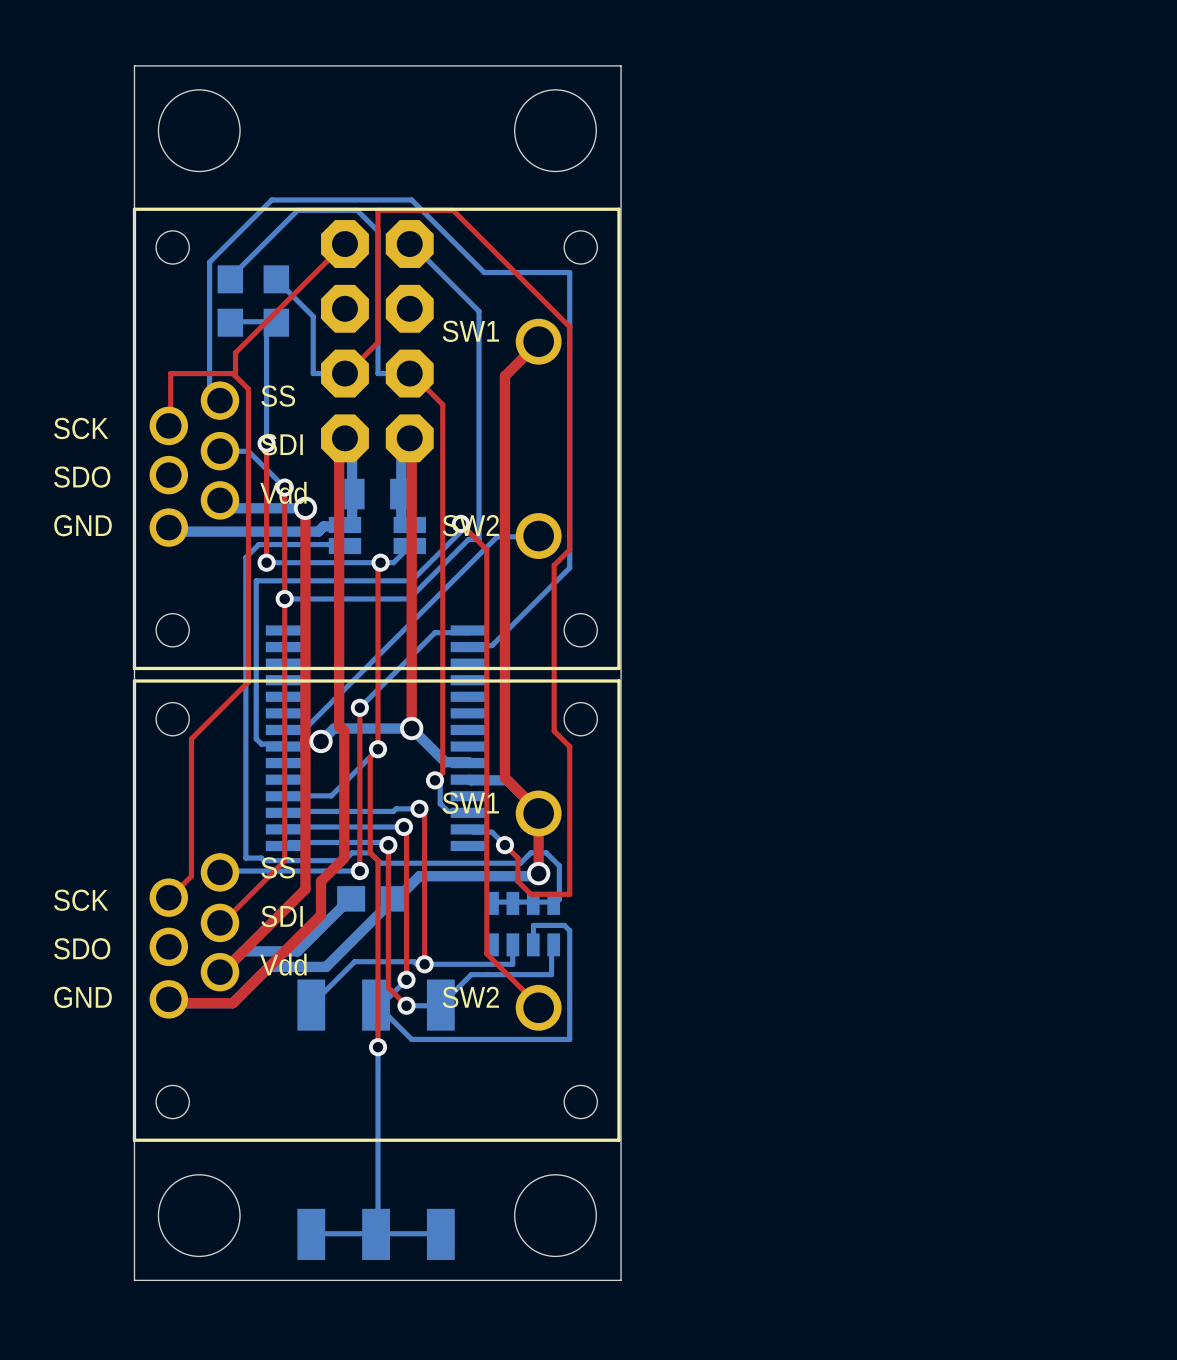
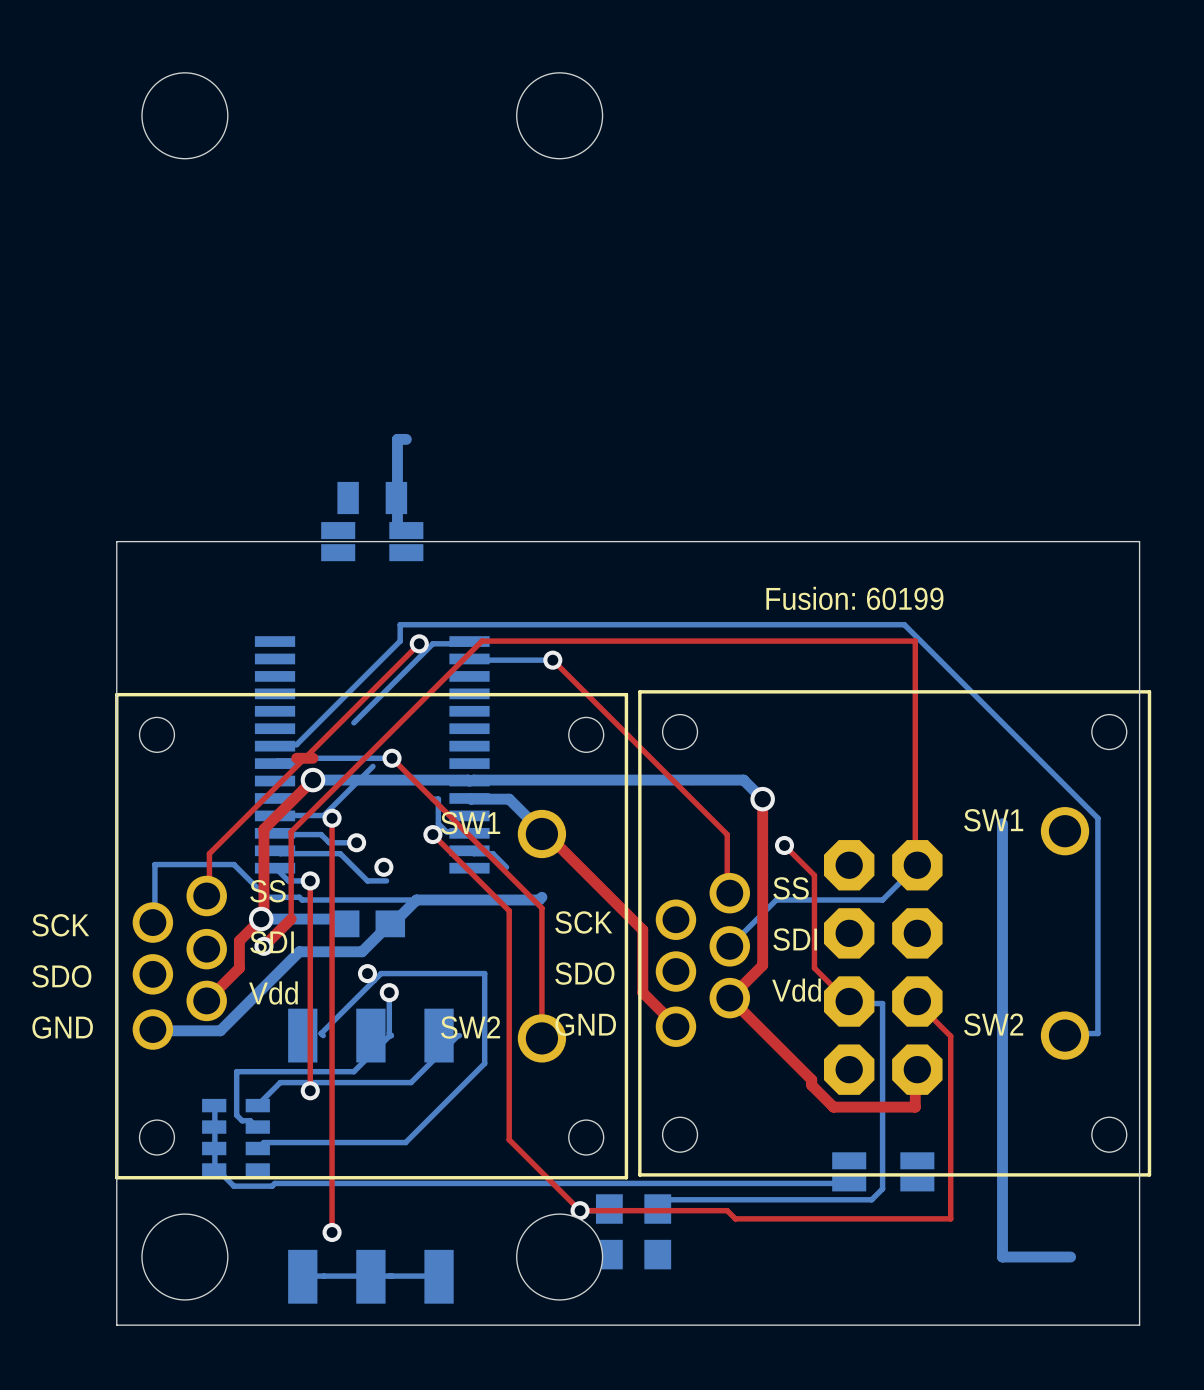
top track: (344, 244) (235, 352) (234, 374) -> none
bottom track: (409, 244) (479, 311) (479, 539) (468, 539) (409, 598) (284, 598) -> none
bottom track: (230, 279) (297, 210) (357, 210) (378, 231) (378, 373) (409, 373) -> none
bottom track: (276, 279) (313, 316) (313, 373) (344, 373) -> none
part: (230, 301) -> none
part: (276, 301) -> none
bottom track: (230, 322) (230, 321) (274, 321) (276, 322) (266, 321) (266, 443) -> none
part: (377, 341) -> none
top track: (538, 341) (504, 376) (504, 777) (538, 811) (538, 873) -> none
top track: (344, 373) (378, 342) (378, 210) (453, 210) (569, 326) (569, 549) (554, 565) (554, 731) (569, 746) (569, 894) (530, 894) (517, 881) (517, 858) (504, 845) -> none
top track: (409, 373) (442, 404) (442, 772) (435, 780) -> none
bottom track: (219, 400) (209, 399) (209, 262) (271, 199) (411, 199) (484, 272) (569, 272) (569, 567) (492, 645) (469, 647) -> (552, 660) (469, 658)
top track: (168, 425) (170, 425) (170, 373) (232, 373) (248, 389) (248, 681) (191, 738) (191, 876) (168, 897) -> none
bottom track: (344, 438) (352, 438) (352, 490) (354, 494) (352, 495) (352, 523) (341, 526) (323, 526) (318, 531) (173, 531) (168, 527) -> none
top track: (344, 438) (339, 443) (339, 725) (344, 731) (344, 858) (321, 881) (321, 915) (232, 1003) (170, 1003) (168, 999) -> none
part: (376, 438) -> none
top track: (409, 438) (411, 438) (411, 728) -> none
top track: (266, 443) (266, 562) -> none
via: (266, 443) -> none
bottom track: (219, 451) (248, 451) (284, 487) -> none
top track: (284, 487) (284, 860) (222, 922) (219, 922) -> none
via: (284, 487) -> none
bottom track: (219, 500) (230, 508) (305, 508) -> none
top track: (305, 508) (305, 889) (300, 894) -> (917, 865) (915, 864) (915, 641) (481, 641) (291, 831) (291, 919)
via: (305, 508) -> none
bottom track: (460, 523) (460, 531) (411, 580) (256, 580) (256, 738) (261, 744) (284, 744) (284, 746) -> (392, 758) (304, 758) (302, 761) (277, 761) (275, 763)
top track: (460, 523) (486, 549) (486, 953) (538, 1007) -> none
via: (460, 523) -> none
board edge: (134, 535) (134, 65) (621, 65) (621, 1280) -> (116, 541) (1139, 541) (1139, 1325) (628, 1325)
bottom track: (538, 536) (497, 536) (403, 630) -> (1065, 1035) (1065, 1033) (1097, 1033) (1097, 818) (904, 624) (400, 624) (400, 641)
bottom track: (344, 546) (258, 544) (245, 557) (245, 858) (261, 858) -> (152, 919) (154, 919) (154, 864) (233, 864) (250, 880)
bottom track: (409, 546) (393, 562) (266, 562) -> none
via: (266, 562) -> none
top track: (380, 562) (378, 565) (378, 749) (370, 757) (370, 852) (378, 860) (378, 1047) -> none
via: (380, 562) -> none
text: none -> Fusion: 60199 (854, 598)
via: (284, 598) -> none
top track: none -> (419, 643) (209, 853) (209, 891) (206, 893)
via: none -> (419, 643)
top track: none -> (552, 660) (727, 834) (727, 891) (729, 893)
via: none -> (552, 660)
top track: (359, 707) (359, 871) -> none
via: (359, 707) -> none
via: (411, 728) -> none
bottom track: (321, 741) (333, 728) (411, 728) (445, 762) -> (312, 780) (443, 780)
via position: (321, 741) -> (312, 780)
top track: none -> (392, 758) (541, 908) (541, 1035)
via position: (378, 749) -> (392, 758)
top track: none -> (312, 780) (263, 829) (263, 916) (239, 940) (239, 968) (209, 998) (206, 998)
bottom track: none -> (469, 781) (743, 780) (762, 799)
via: (435, 780) -> none
top track: none -> (762, 799) (762, 965) (729, 998)
via: none -> (762, 799)
top track: none -> (332, 818) (332, 1232)
via: none -> (332, 818)
bottom track: none -> (1002, 823) (1002, 1257) (1070, 1257)
bottom track: (419, 808) (396, 808) (393, 811) (284, 812) -> (356, 842) (329, 842) (321, 834) (275, 833)
top track: (419, 808) (424, 814) (424, 964) -> none
via position: (419, 808) -> (432, 834)
top track: none -> (541, 831) (642, 929) (642, 992) (675, 1026)
top track: none -> (432, 834) (509, 910) (509, 1139) (580, 1210) (727, 1210) (735, 1218) (950, 1218) (950, 1036) (917, 1001)
via: none -> (356, 842)
top track: none -> (784, 845) (814, 875) (814, 968) (849, 1001)
via: none -> (784, 845)
bottom track: (403, 826) (287, 826) (284, 829) -> (386, 880) (367, 880) (340, 853) (280, 853) (275, 850)
top track: (403, 826) (406, 829) (406, 979) -> none
via: (403, 826) -> none
bottom track: none -> (917, 865) (882, 899) (776, 899) (729, 946)
bottom track: (388, 845) (385, 842) (289, 842) (284, 845) -> (310, 880) (288, 880) (275, 868)
top track: (388, 845) (388, 987) (406, 1005) -> none
via: (504, 845) -> none
top track: none -> (310, 880) (310, 1090)
via: none -> (310, 880)
bottom track: (264, 860) (344, 860) (352, 852) (370, 852) (380, 863) (520, 863) (530, 852) (546, 852) (559, 865) (559, 899) (551, 899) (553, 903) (492, 903) -> (253, 883) (266, 897) (299, 897) (302, 899) (416, 899)
bottom track: (359, 871) (219, 872) -> none
via: (359, 871) -> none
via: (538, 873) -> none
via: none -> (261, 919)
bottom track: (351, 898) (297, 951) (243, 951) (222, 972) (219, 972) -> (344, 923) (340, 919) (261, 919)
part: none -> (894, 933)
top track: (274, 920) (222, 972) (219, 972) -> none
via: none -> (263, 946)
part rotation: 0° (523, 924) -> 90° clockwise (236, 1137)
part position: (523, 924) -> (236, 1137)
bottom track: (367, 925) (326, 966) (269, 966) (232, 1003) (173, 1003) (168, 999) -> (362, 951) (299, 951) (220, 1030) (157, 1030) (152, 1026)
part: none -> (883, 967)
bottom track: (512, 944) (512, 964) (416, 964) (414, 961) (354, 961) (311, 1005) -> none
bottom track: (533, 944) (533, 925) (564, 925) (569, 930) (569, 1039) (411, 1039) (376, 1005) (380, 1005) (406, 979) -> none
bottom track: (553, 944) (551, 946) (551, 974) (471, 974) (440, 1005) (406, 1005) -> none
via: none -> (367, 973)
bottom track: none -> (389, 992) (389, 1033) (391, 1035) (353, 1071) (236, 1071) (236, 1115) (242, 1120) (250, 1120) (257, 1127)
via: (424, 964) -> none
top track: none -> (729, 998) (811, 1079) (811, 1085) (833, 1107) (915, 1107) (915, 1071) (917, 1069)
bottom track: none -> (849, 1001) (849, 1003) (882, 1003) (882, 1188) (871, 1199) (667, 1199) (657, 1209)
via position: (406, 979) -> (389, 992)
bottom track: none -> (323, 1035) (321, 1033) (381, 973) (484, 973) (484, 1063) (405, 1142) (263, 1142) (257, 1148)
via: (406, 1005) -> none
bottom track: none -> (459, 1035) (411, 1082) (280, 1082) (257, 1105)
bottom track: (378, 1047) (378, 1231) (376, 1234) -> none
via: (378, 1047) -> none
via: none -> (310, 1090)
bottom track: none -> (214, 1105) (214, 1169) (217, 1169) (233, 1186) (272, 1186) (274, 1183) (849, 1182)
part: none -> (849, 1171)
part: none -> (917, 1171)
via: none -> (580, 1210)
part: none -> (609, 1231)
part: none -> (657, 1231)
via: none -> (332, 1232)

